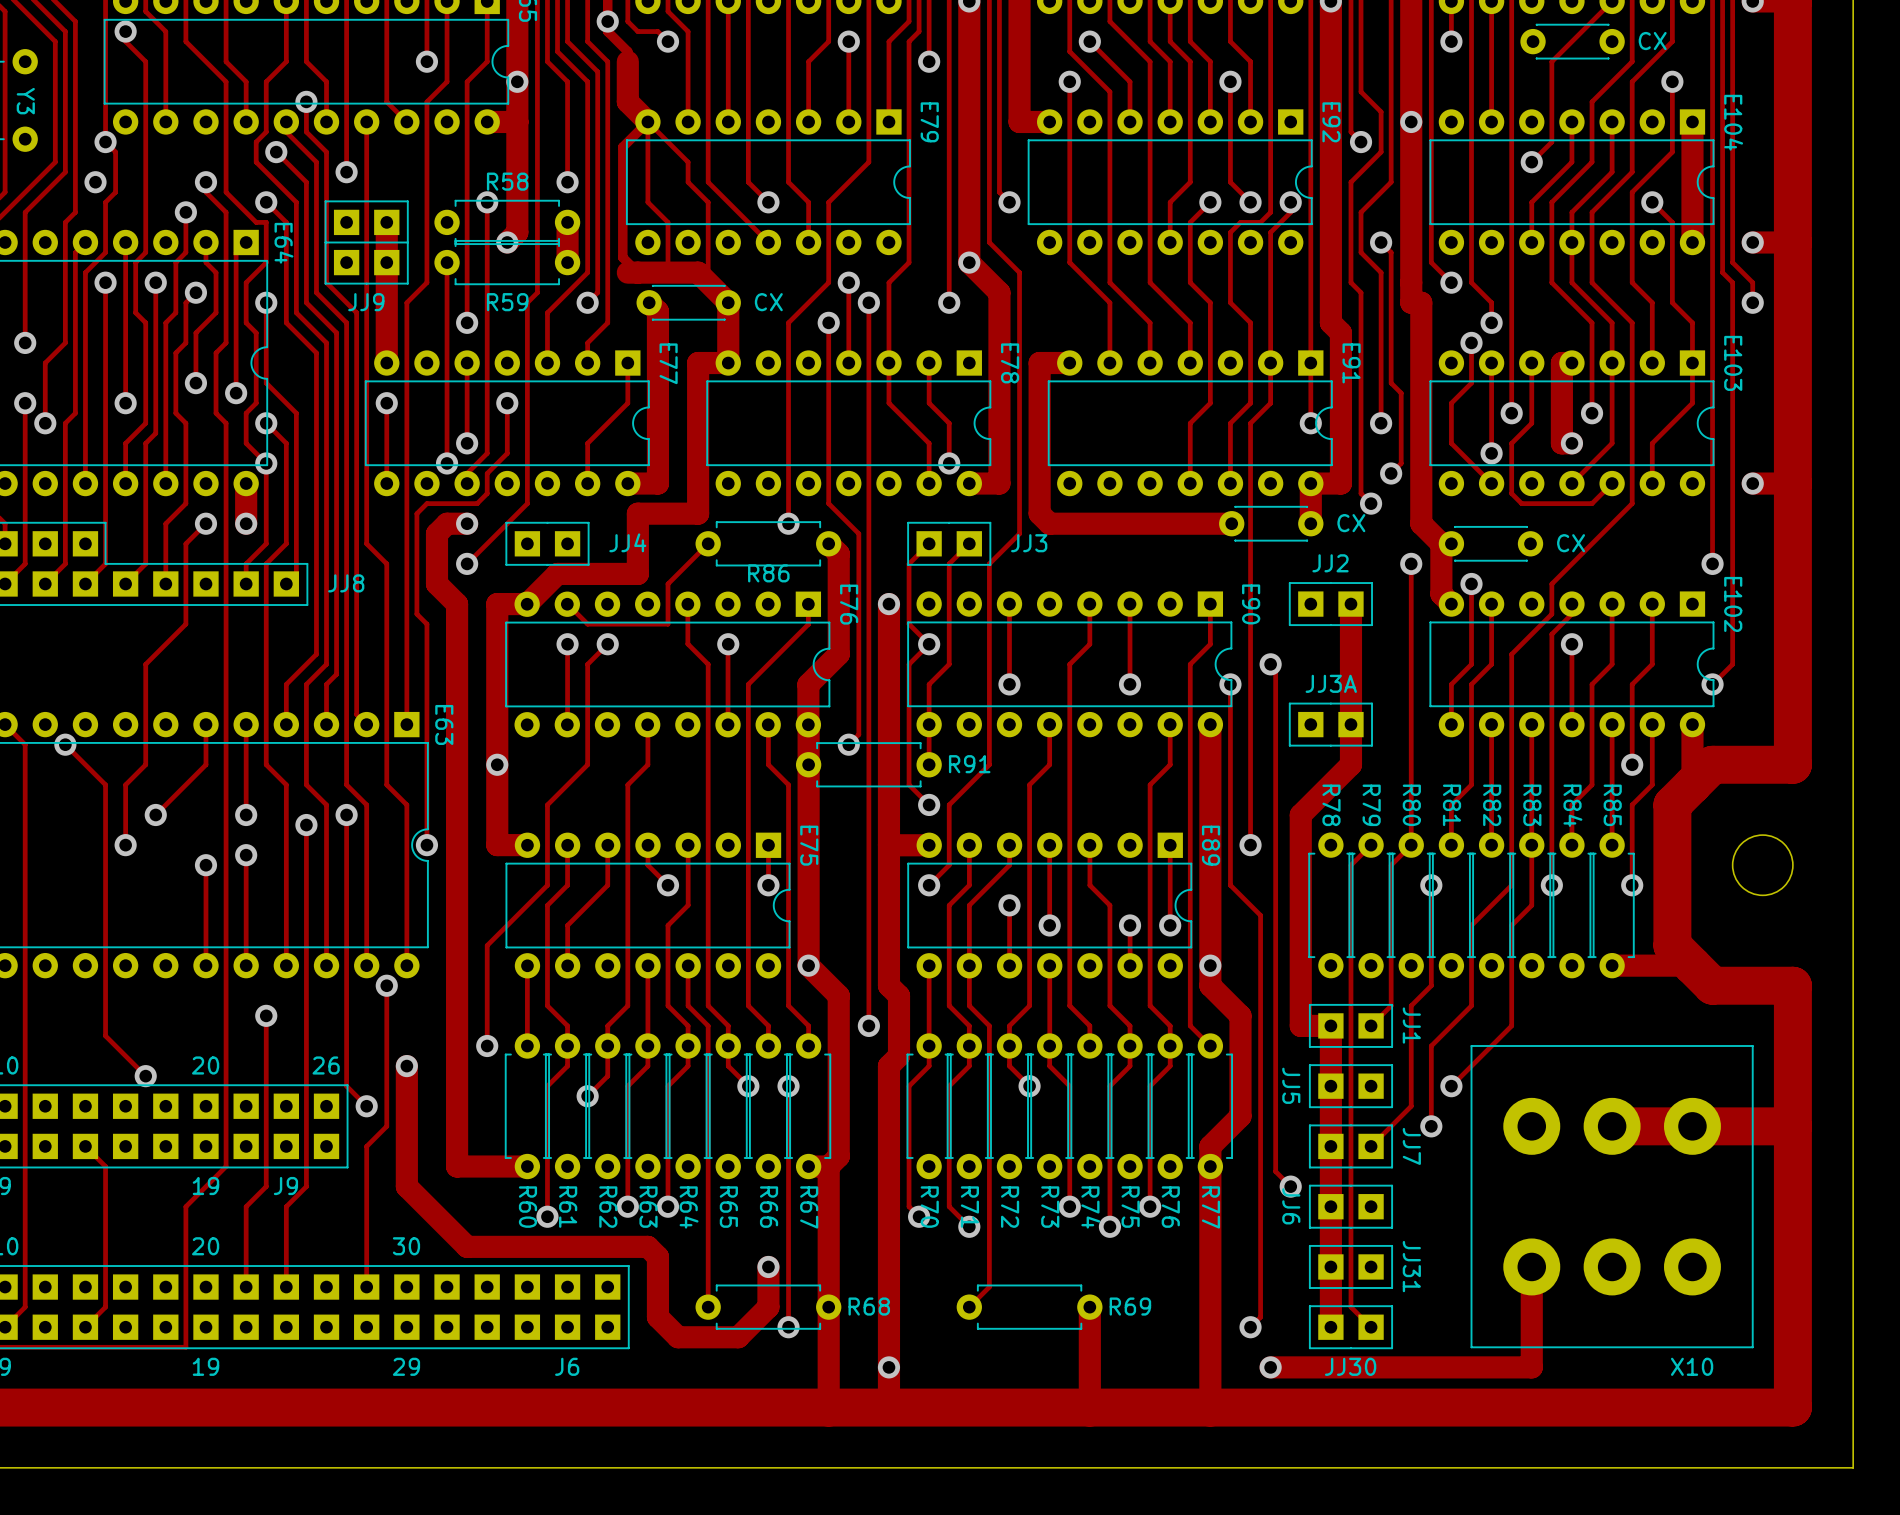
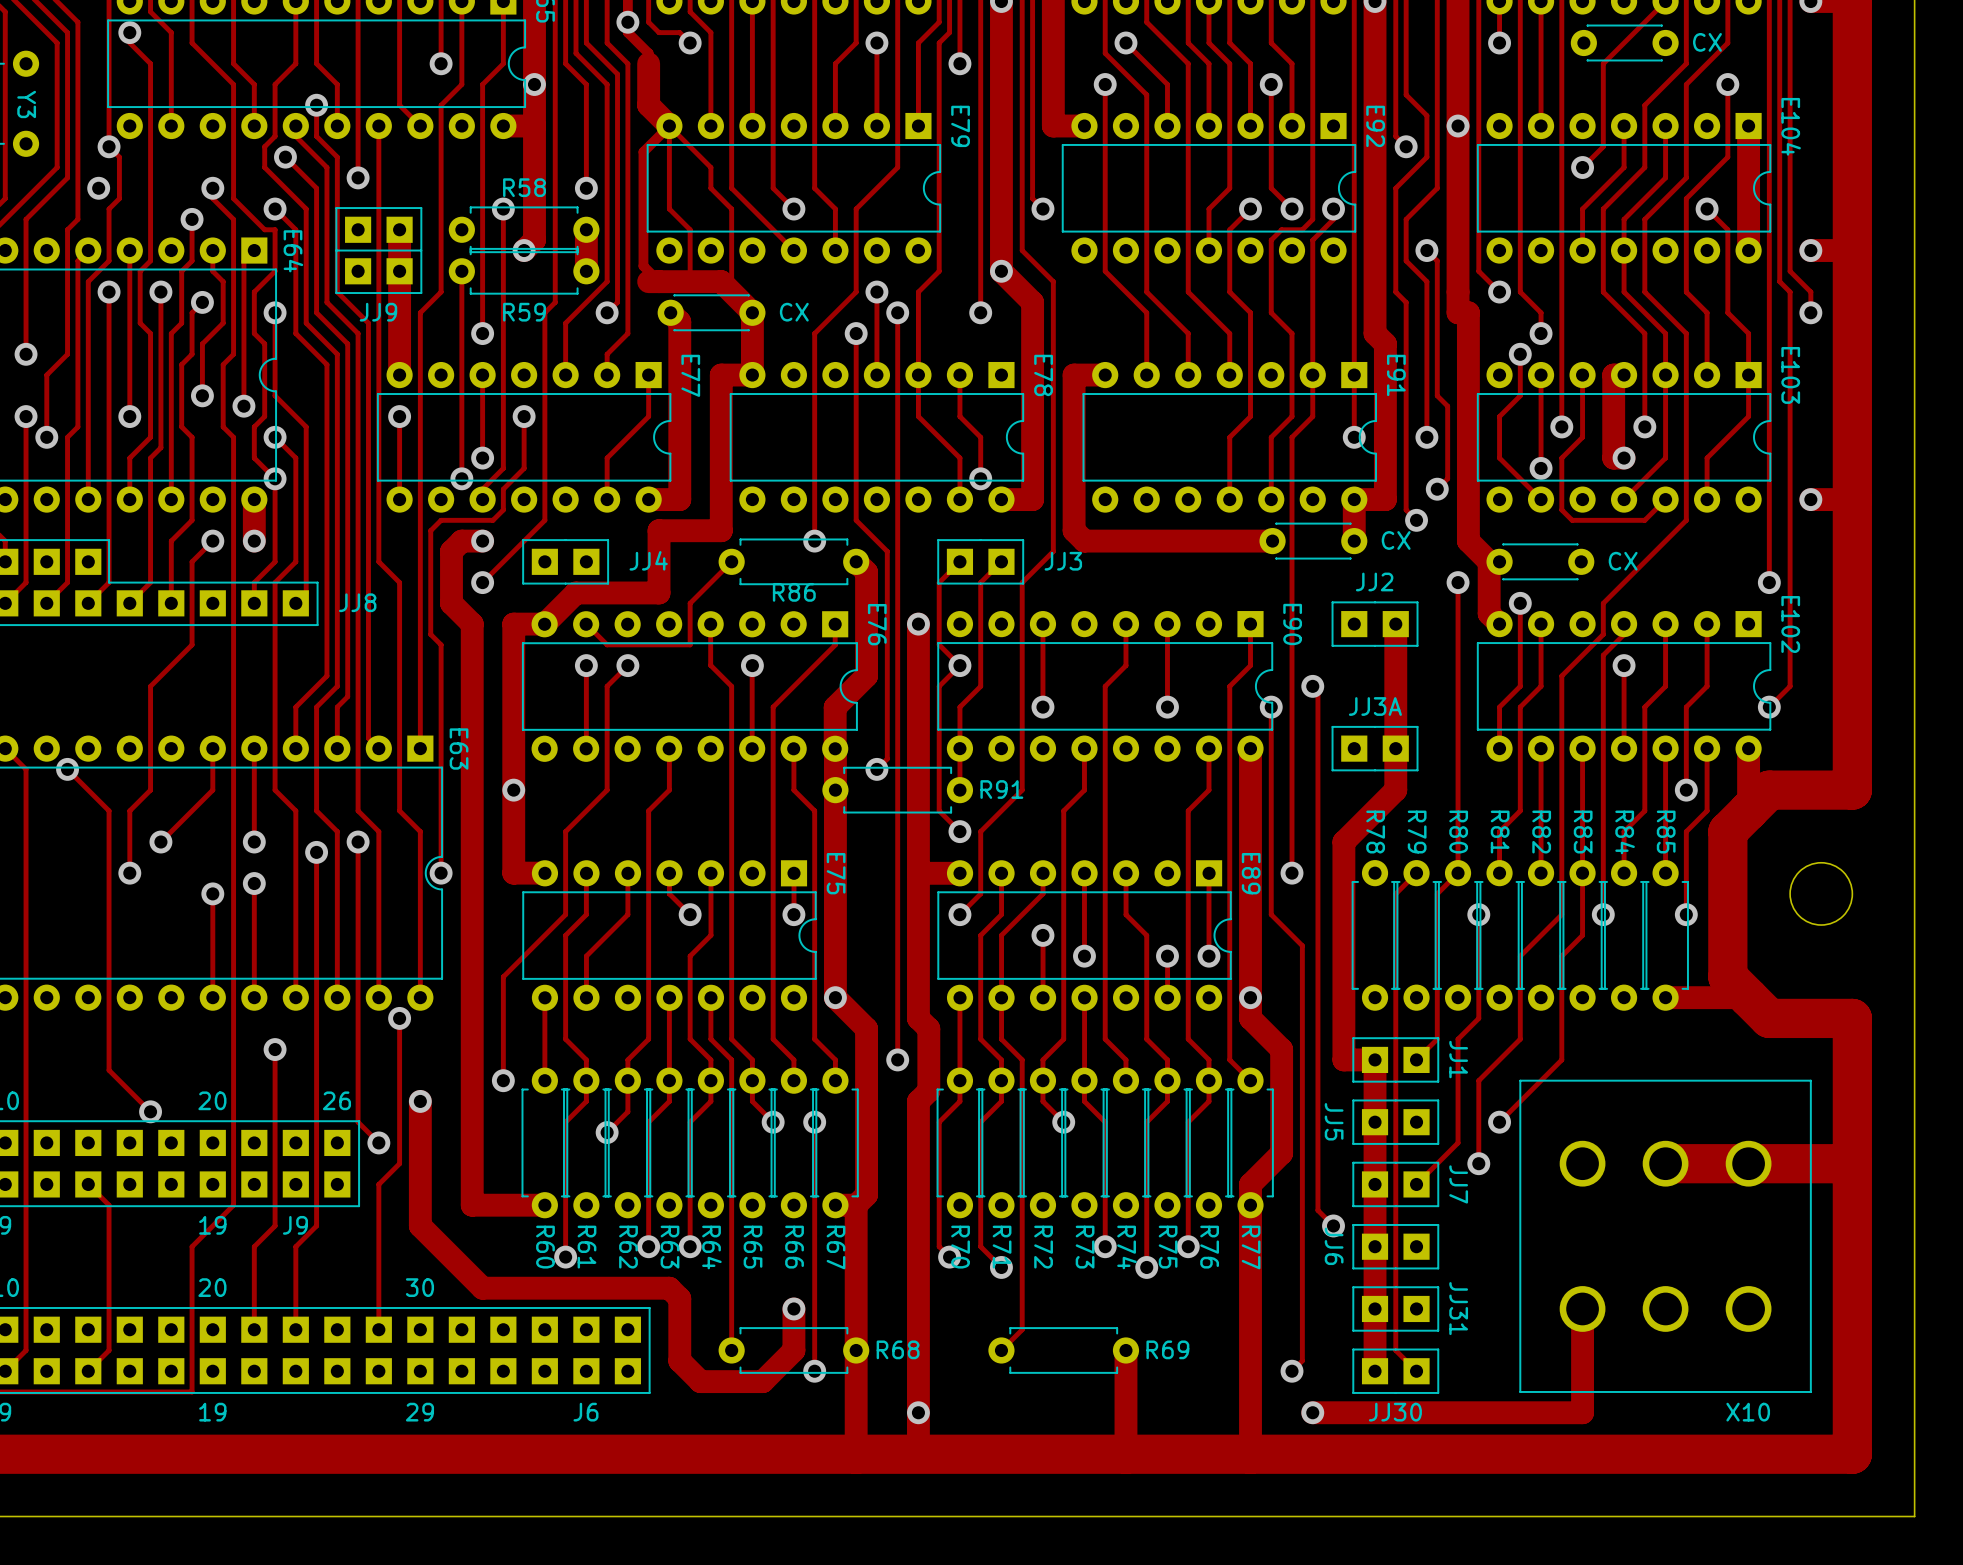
X10 footprint: [1470, 1045, 1754, 1349] -> [1519, 1079, 1812, 1393]

